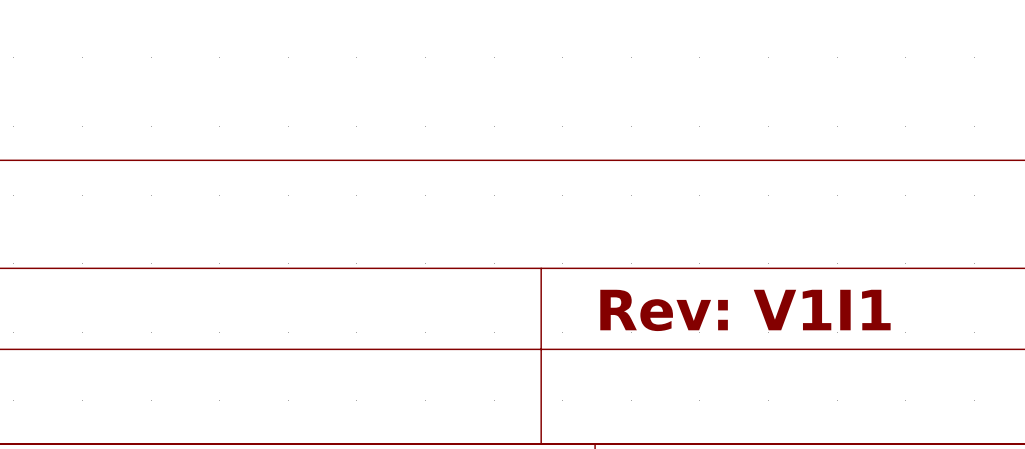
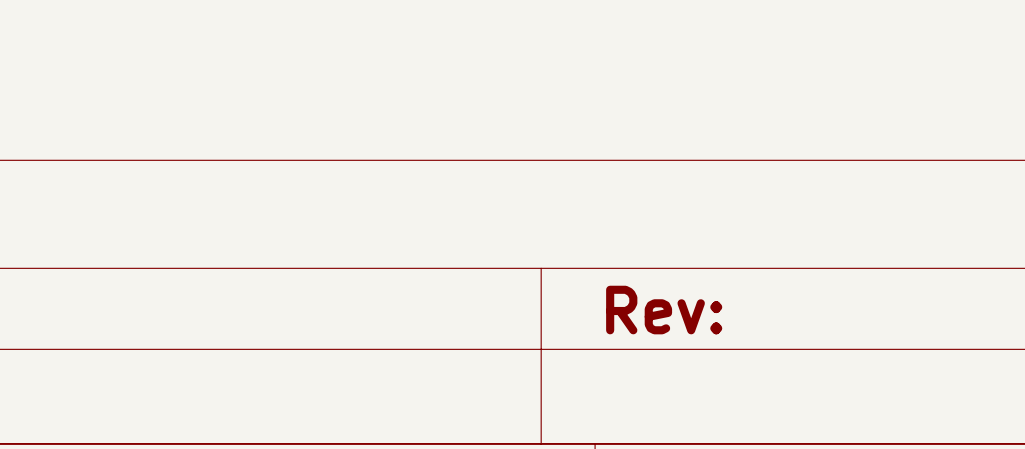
title block: Rev: V1I1 (745, 310) -> Rev: (664, 310)

